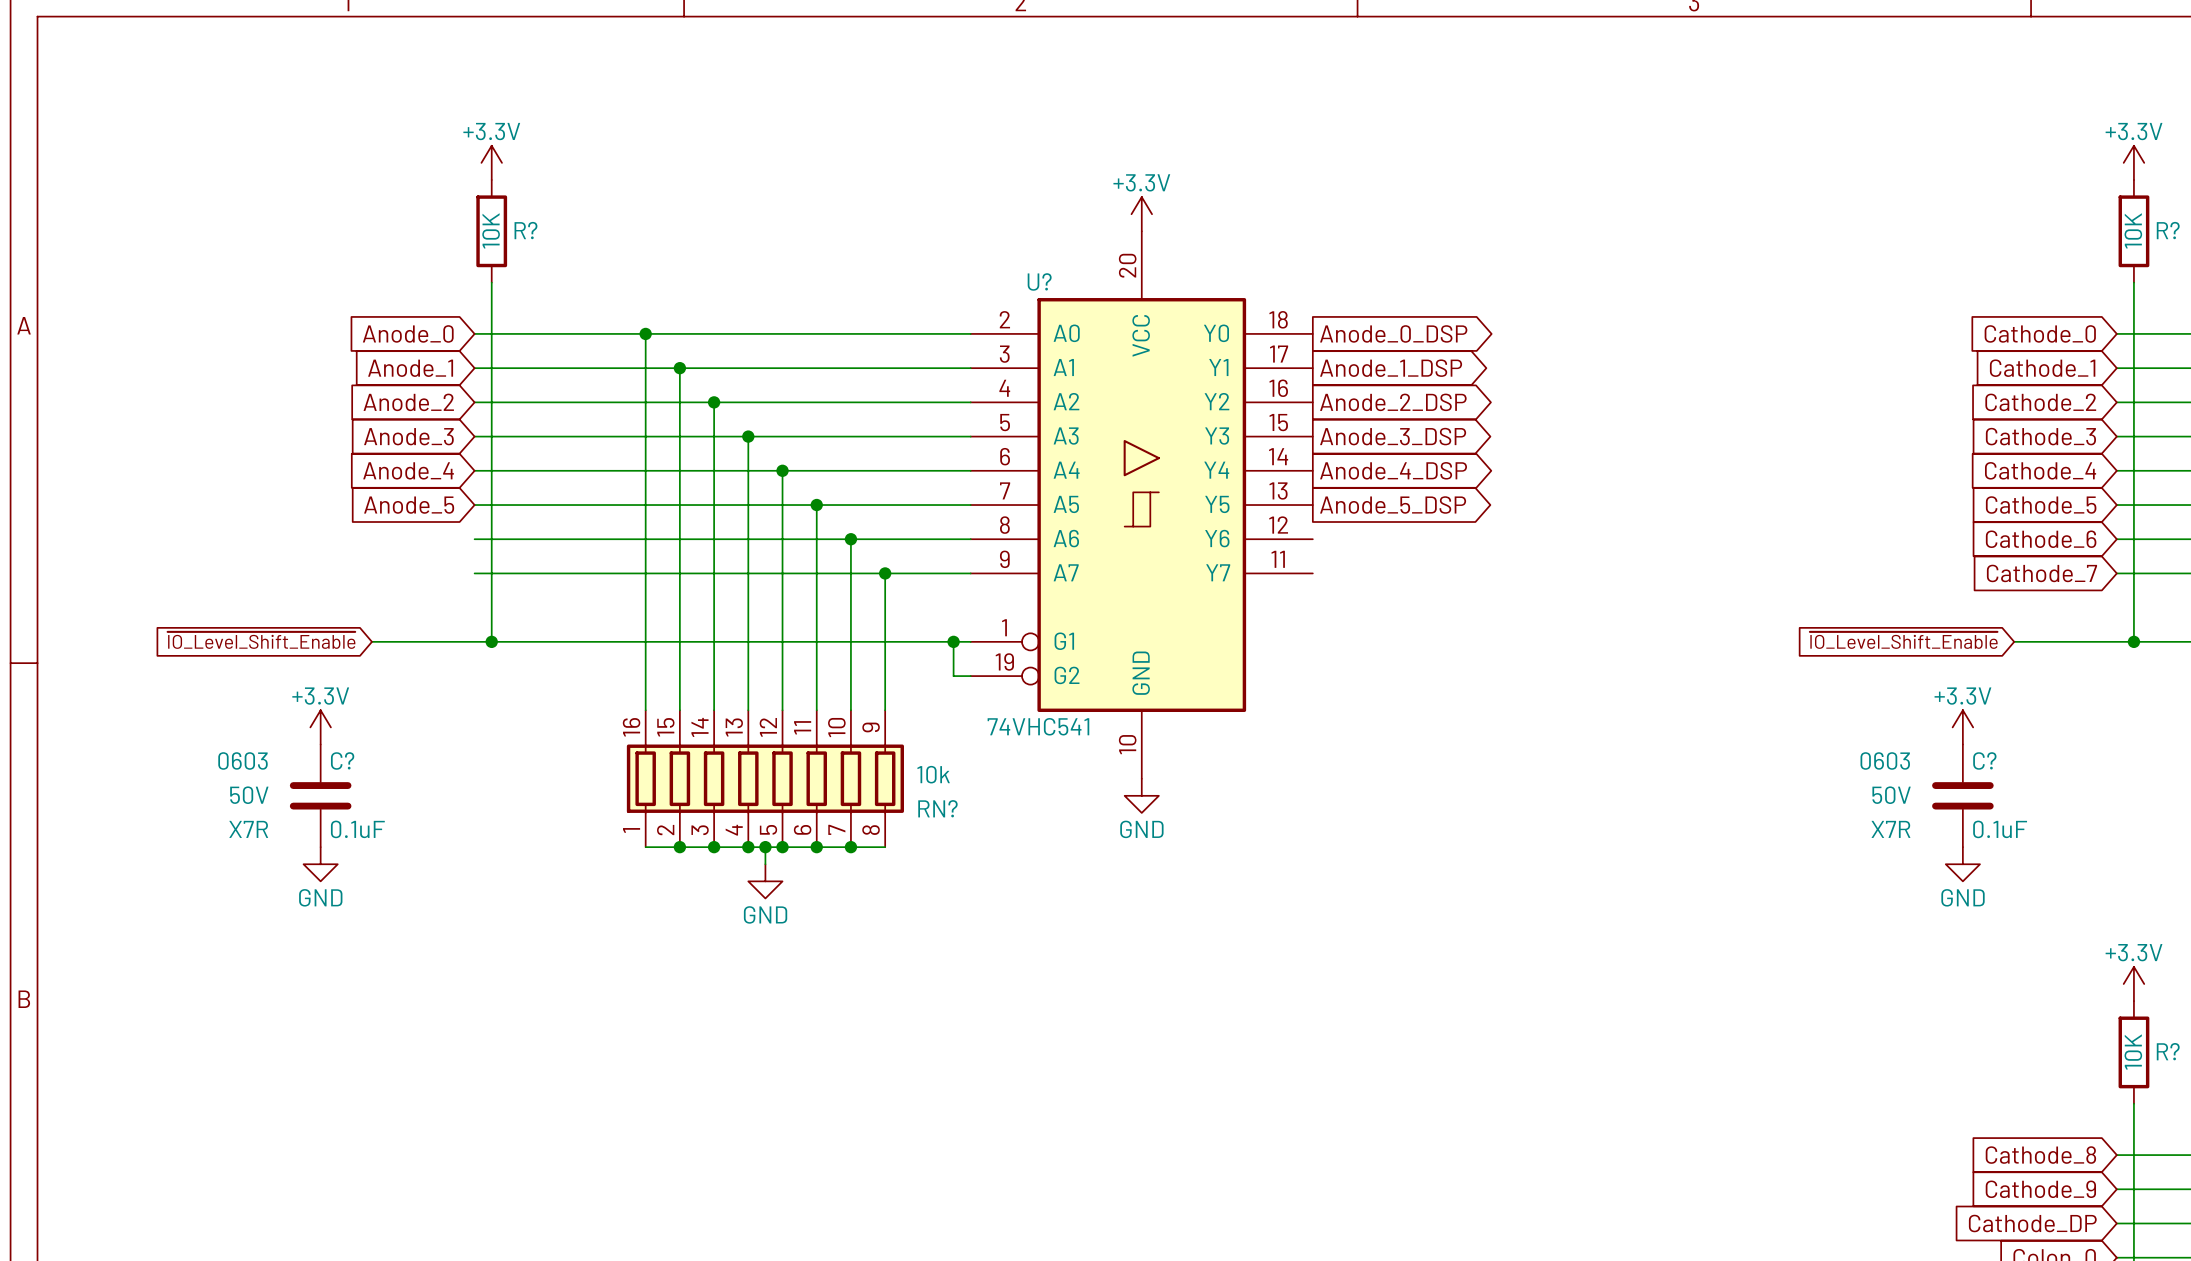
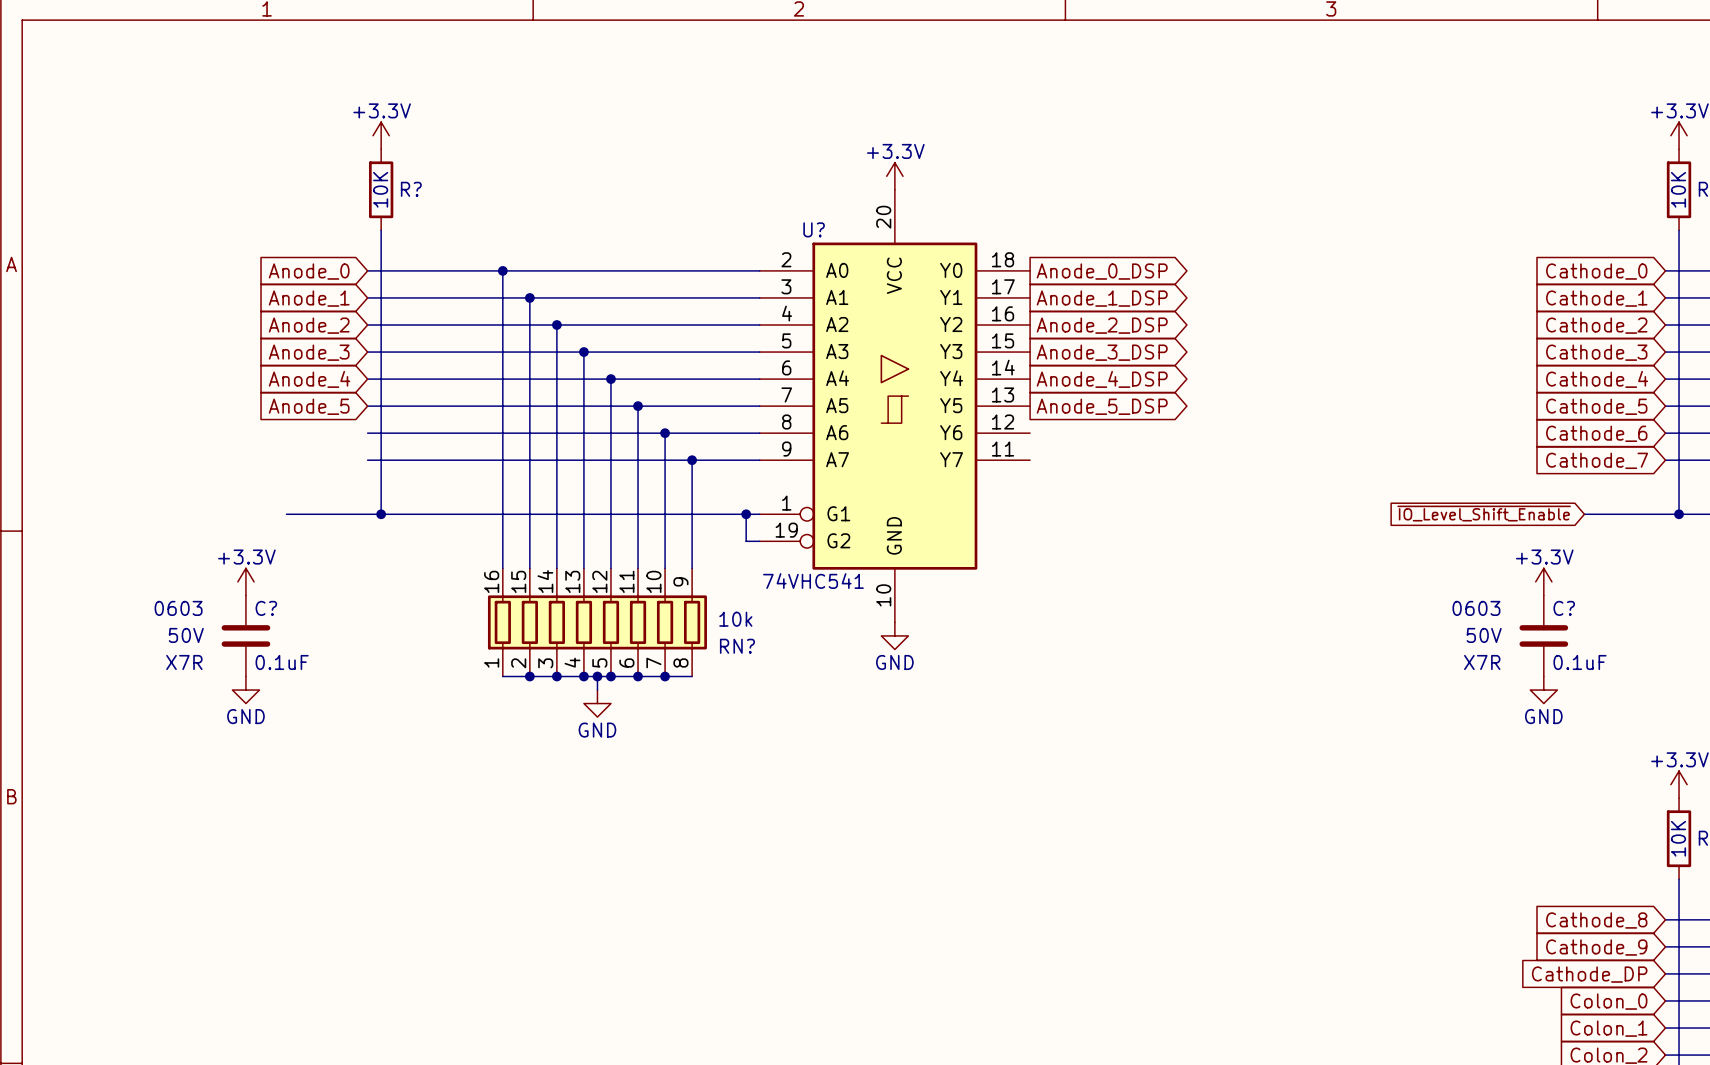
global label: ~{IO_Level_Shift_Enable} (261, 640) -> none

